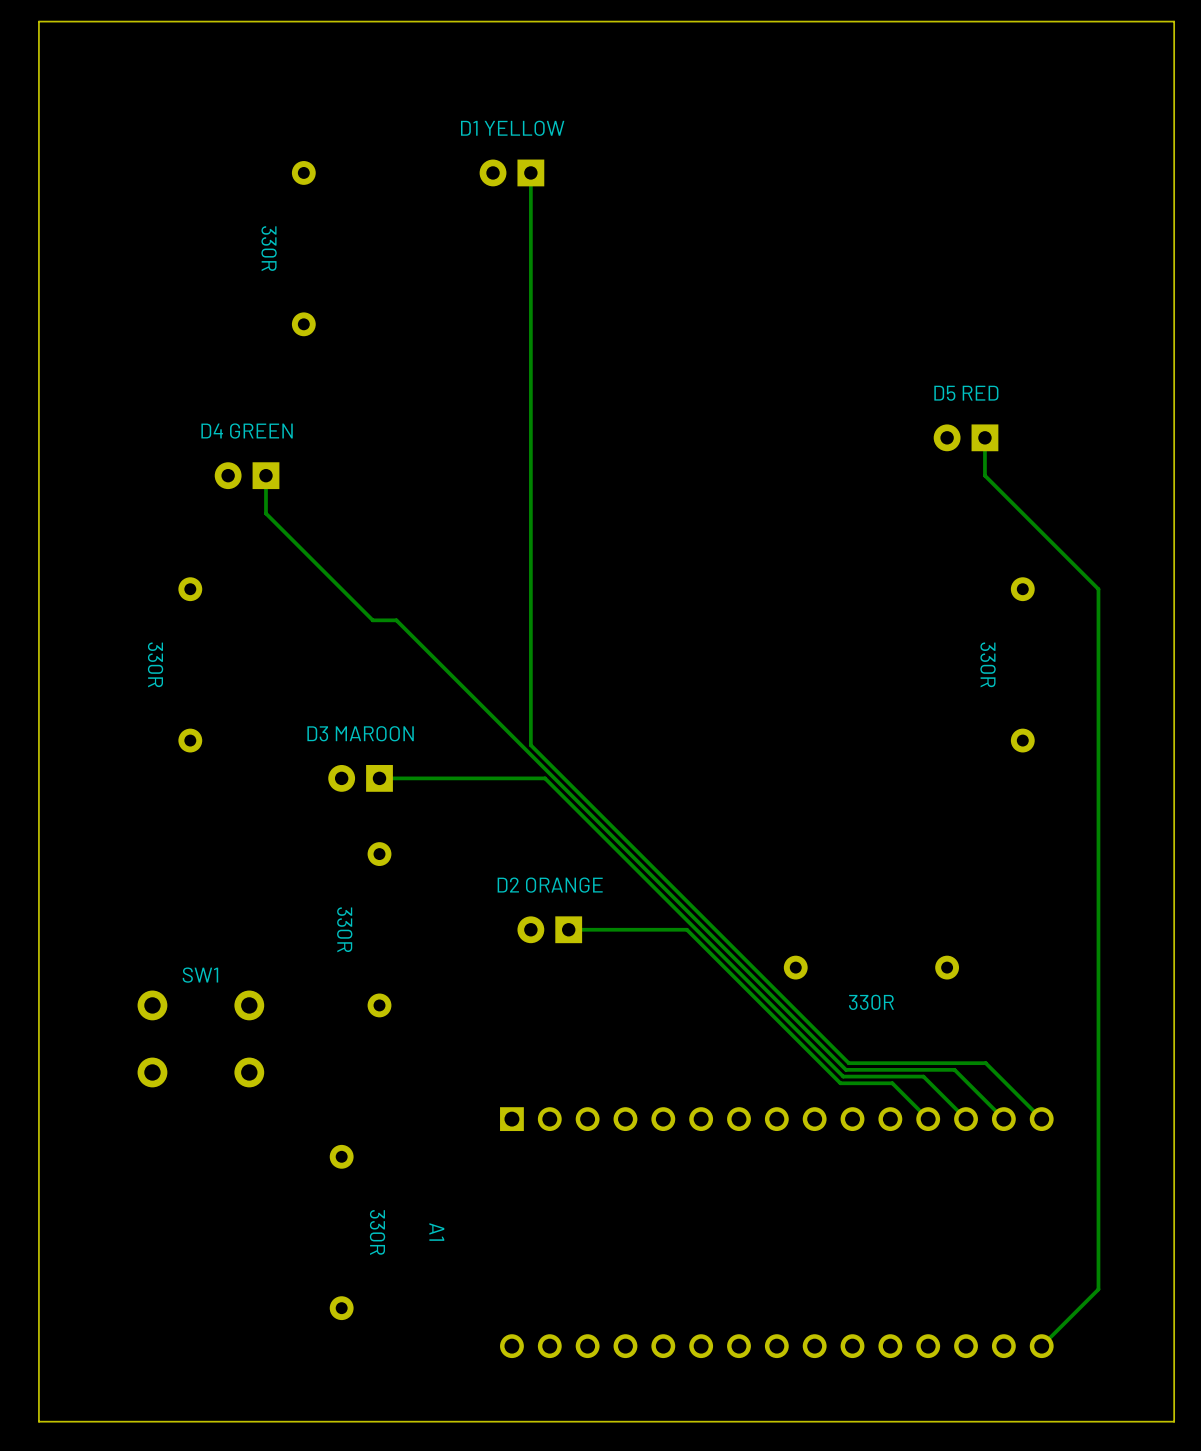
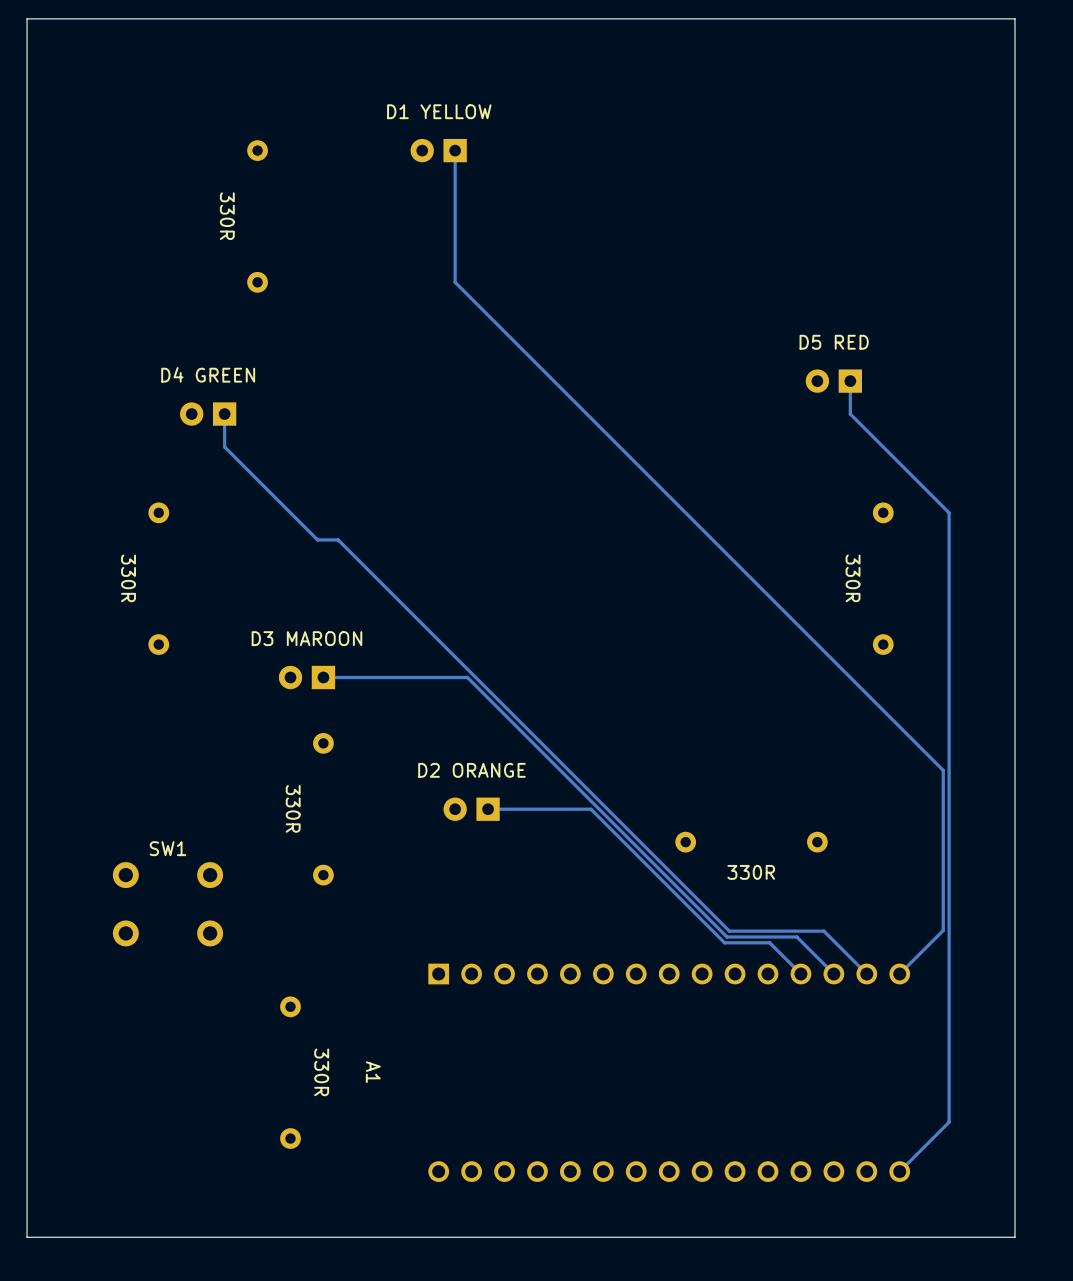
track: (530, 324) (530, 745) (848, 1063) (985, 1063) (1041, 1119) -> (455, 282) (943, 770) (943, 930) (899, 974)

